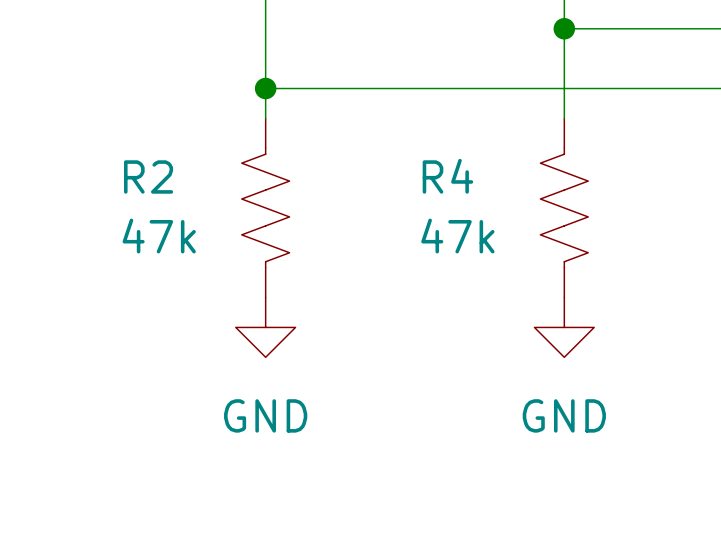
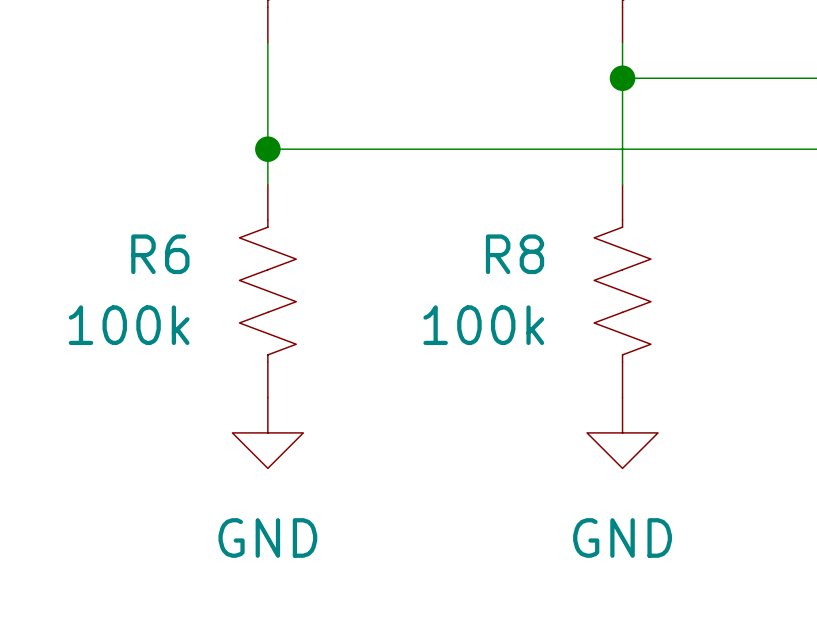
R2 name: R2 (148, 176) -> R6 (160, 254)
R4 name: R4 (447, 176) -> R8 (515, 254)
R2 value: 47k (159, 236) -> 100k (129, 325)
R4 value: 47k (457, 236) -> 100k (483, 325)

